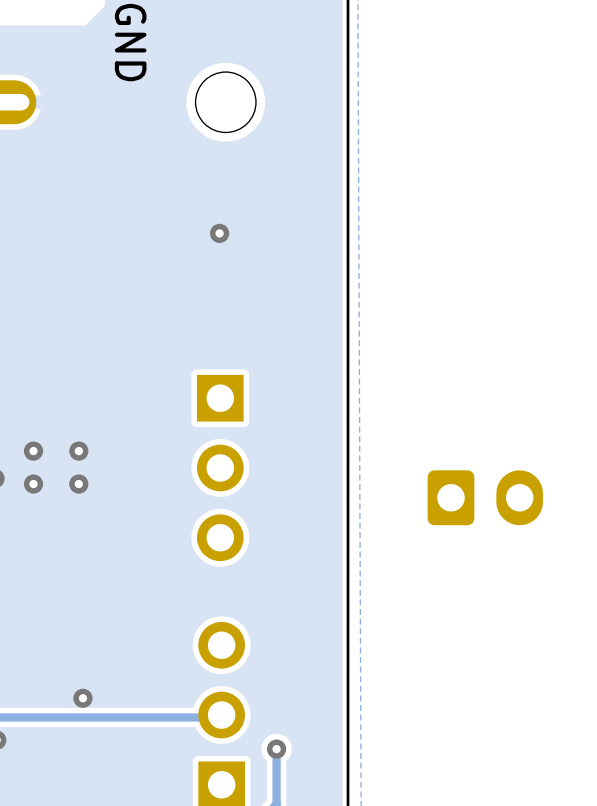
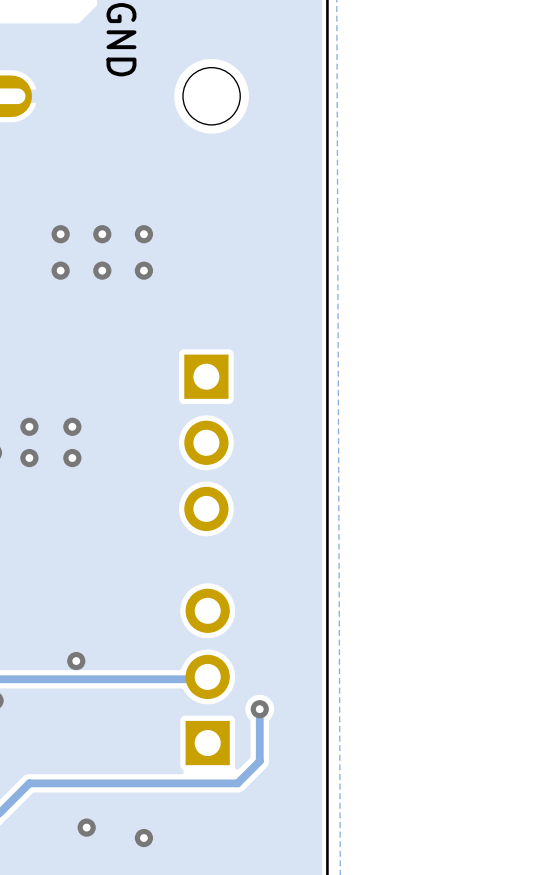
via: (219, 233) -> none
via: none -> (60, 234)
via: none -> (102, 234)
via: none -> (143, 234)
via: none -> (60, 270)
via: none -> (102, 270)
via: none -> (143, 270)
part: (485, 497) -> none

